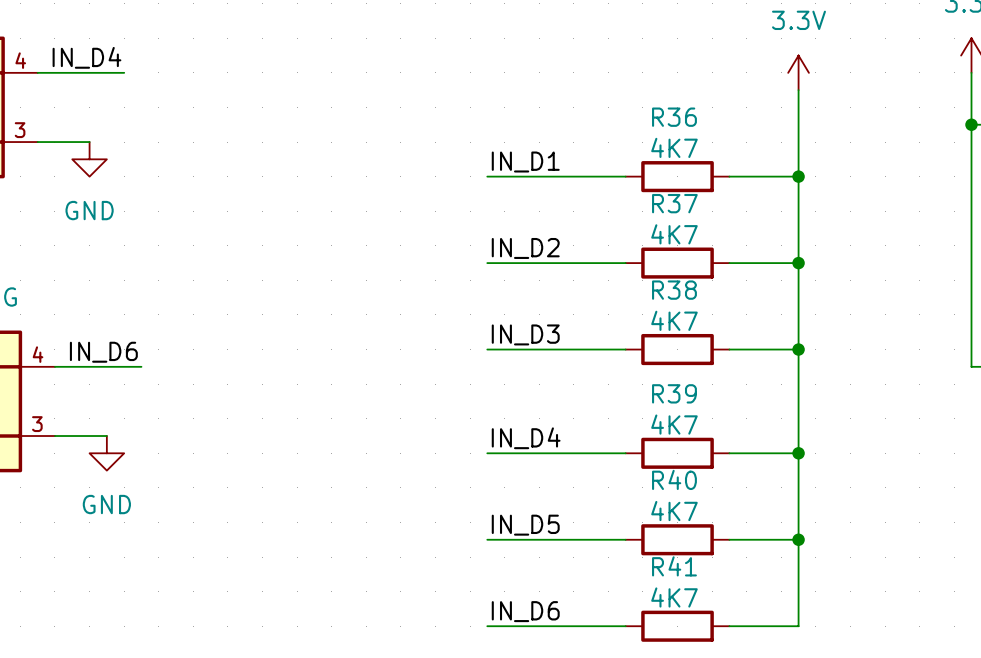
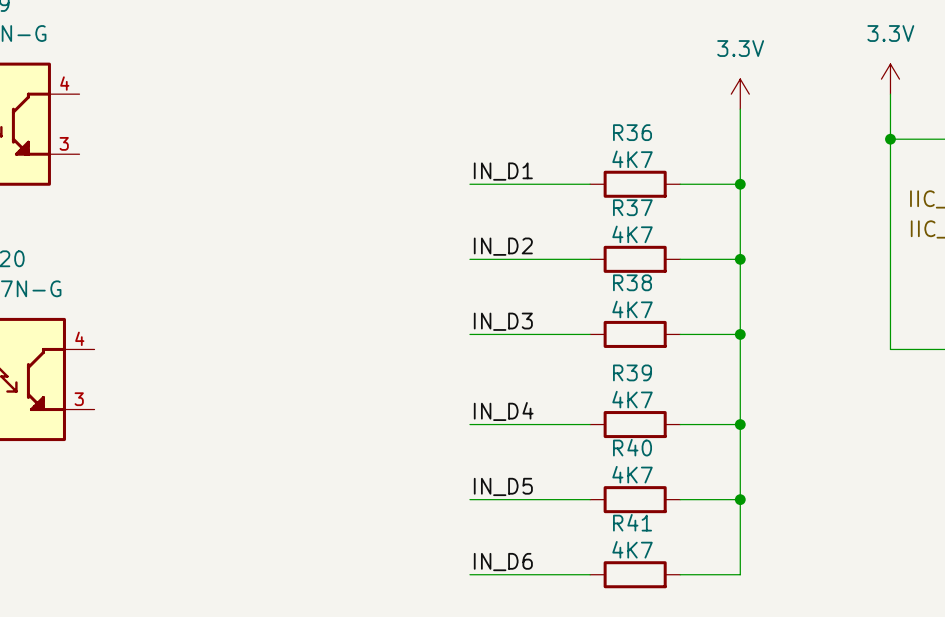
label: IN_D4 (86, 57) -> none
wire: (37, 72) (124, 72) -> none
wire: (37, 142) (89, 142) -> none
power symbol: GND (89, 159) -> none
label: IN_D6 (103, 352) -> none
wire: (54, 366) (141, 366) -> none
wire: (54, 436) (106, 436) -> none
power symbol: GND (106, 453) -> none

